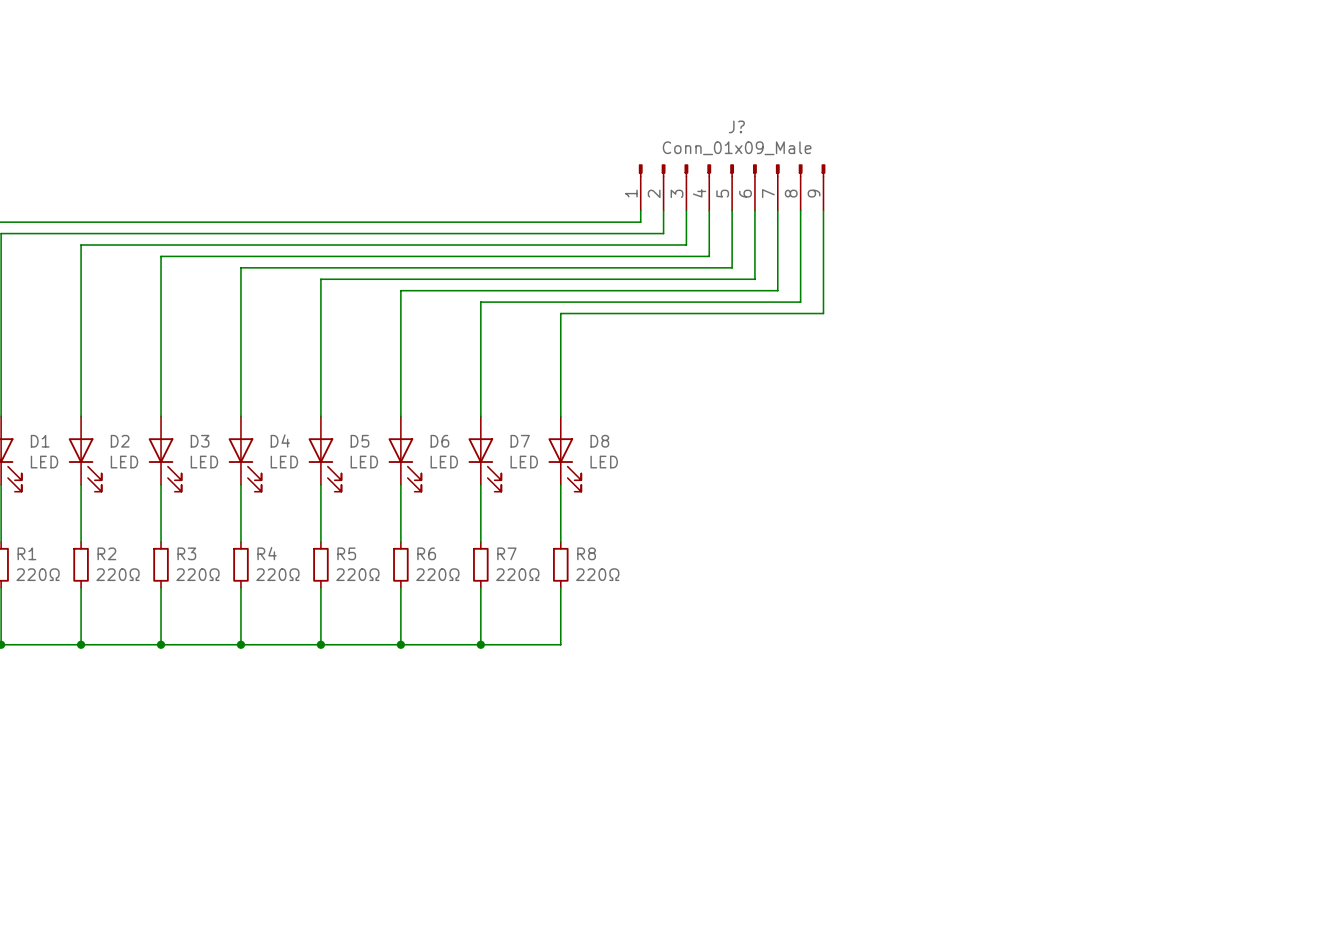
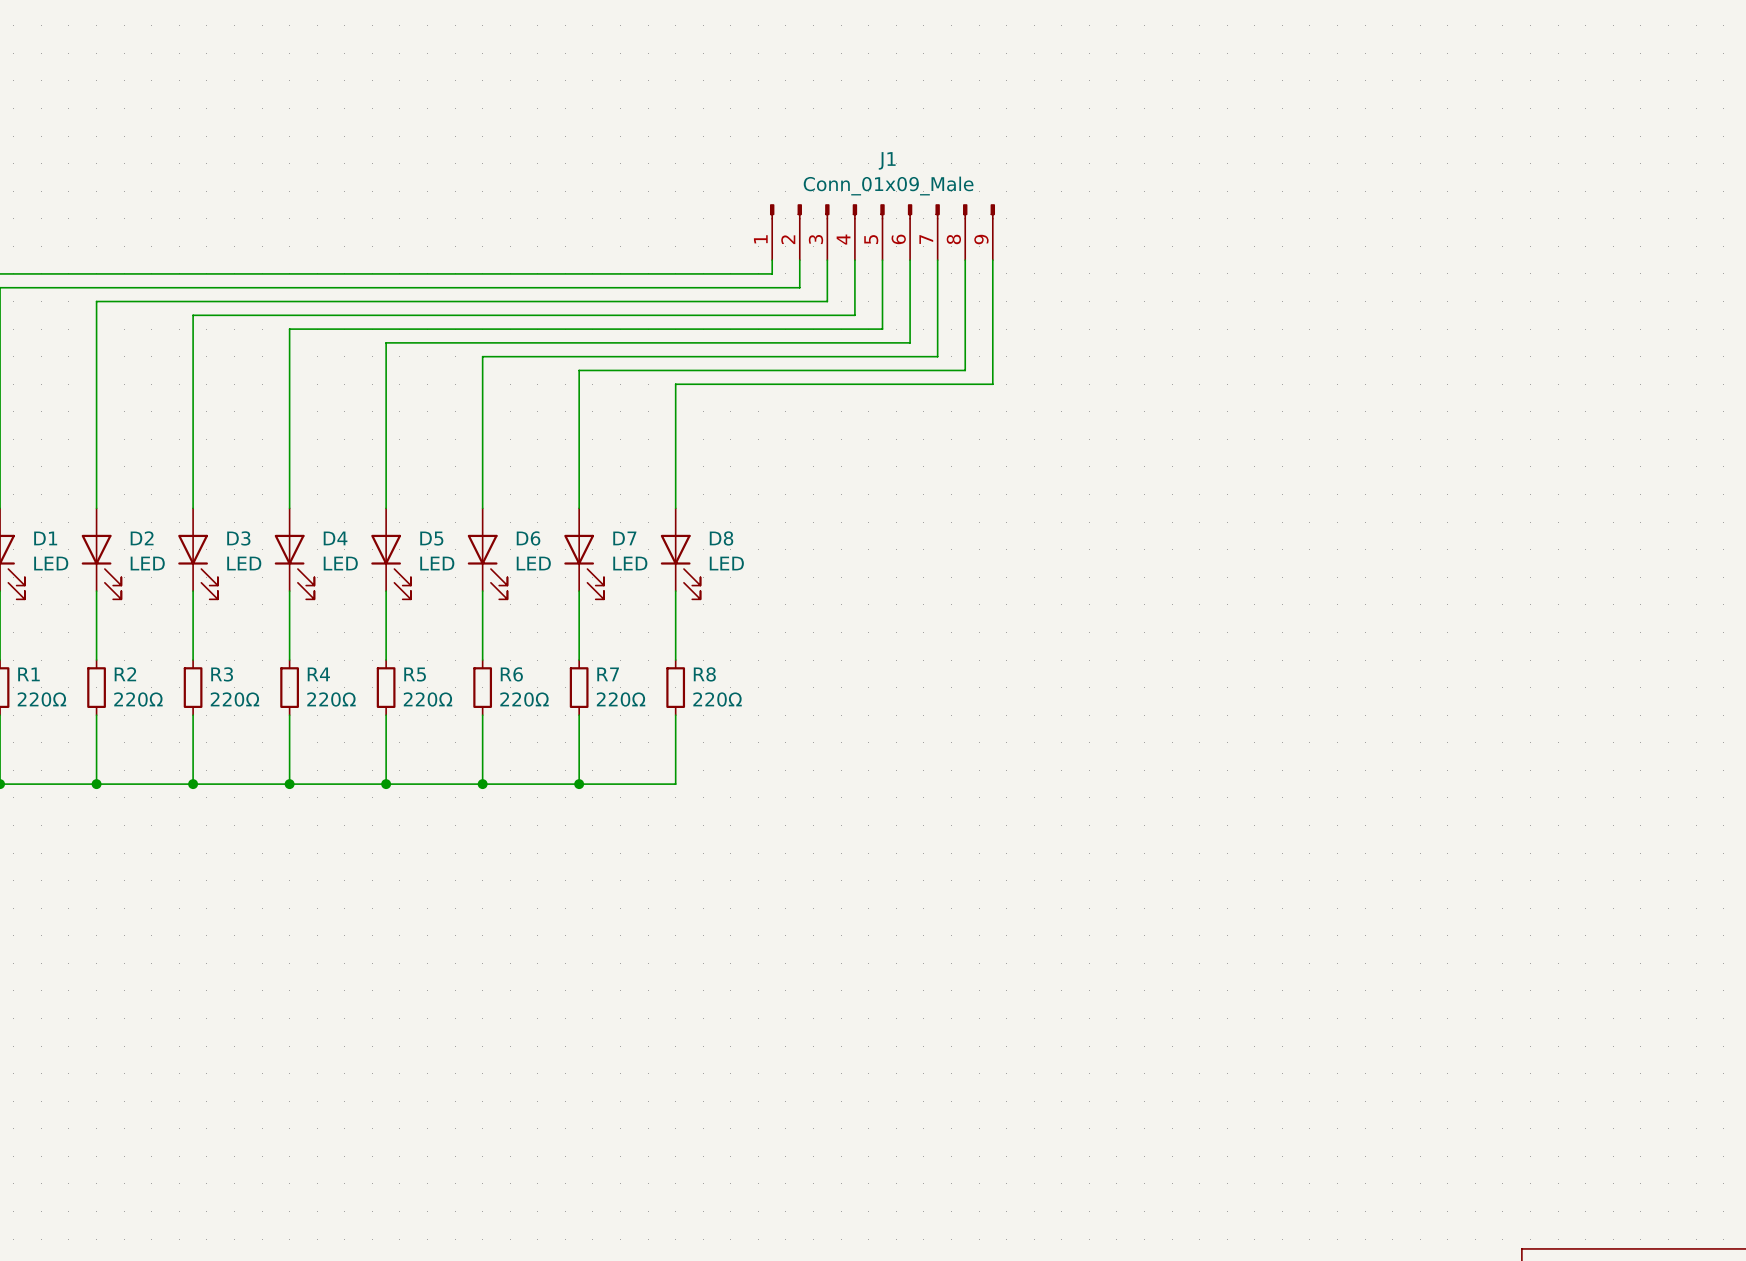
J? name: J? (736, 126) -> J1 (887, 160)

